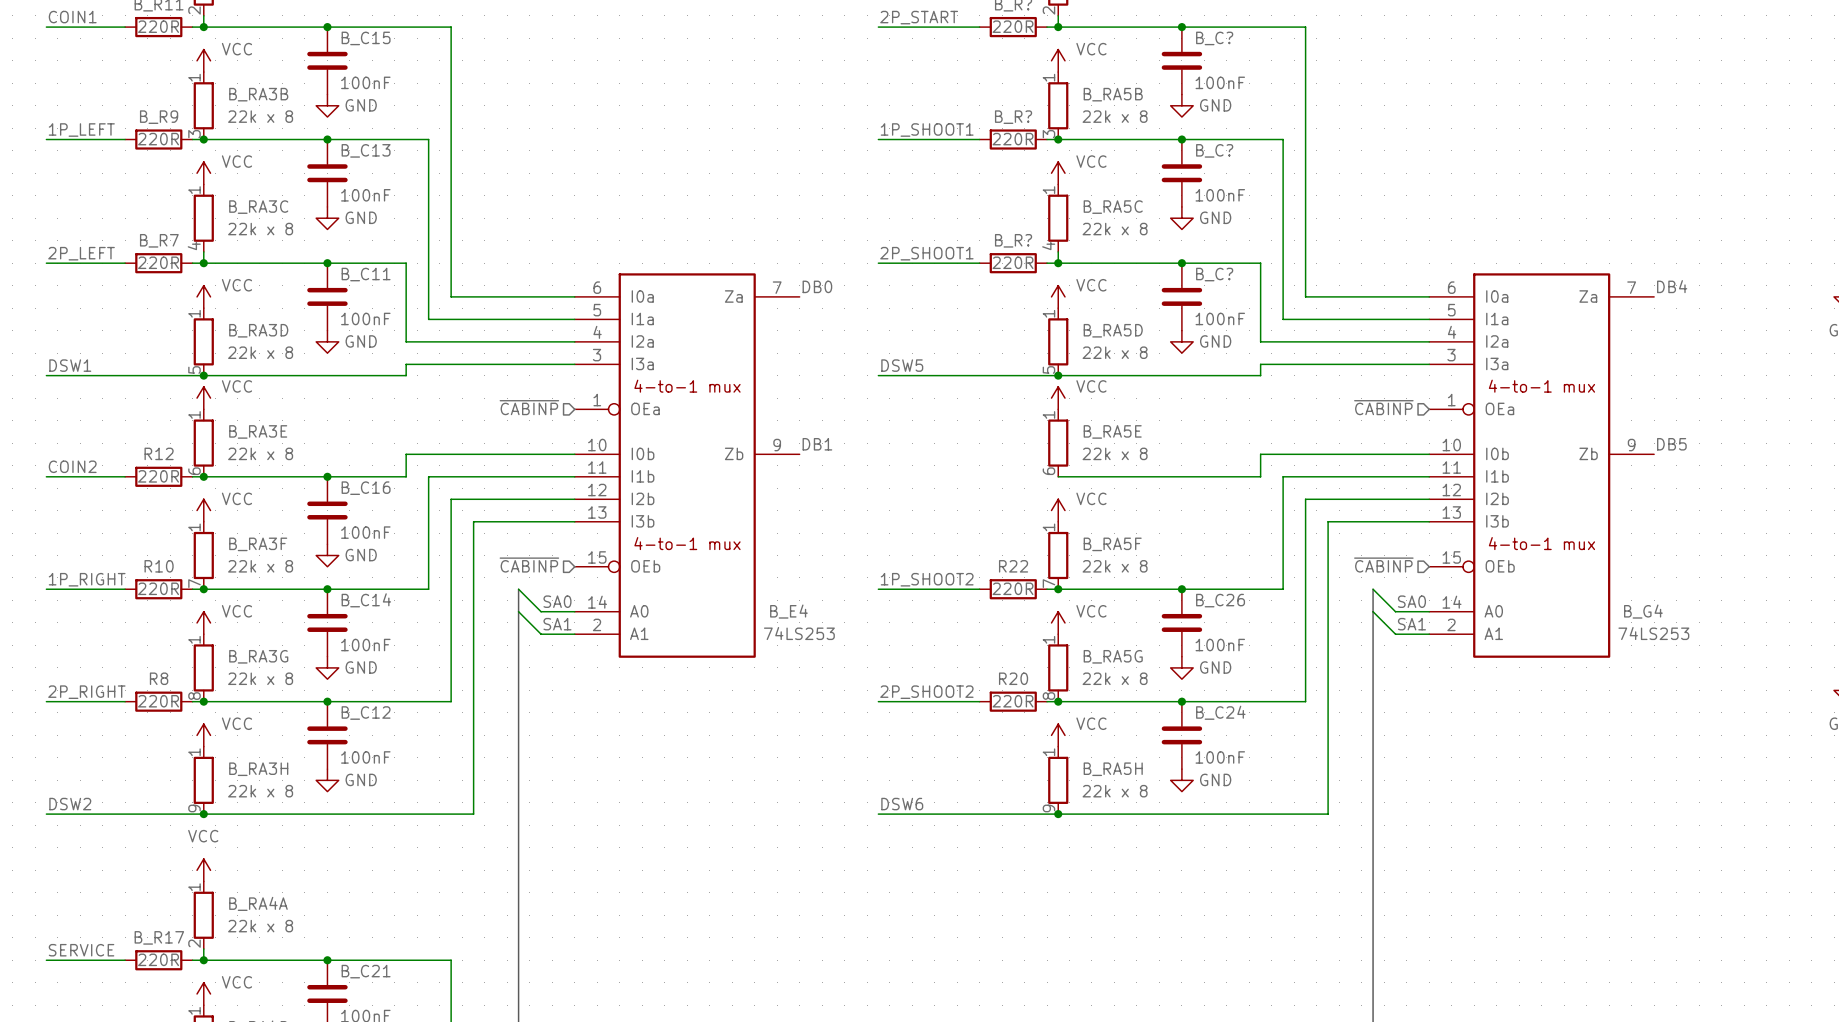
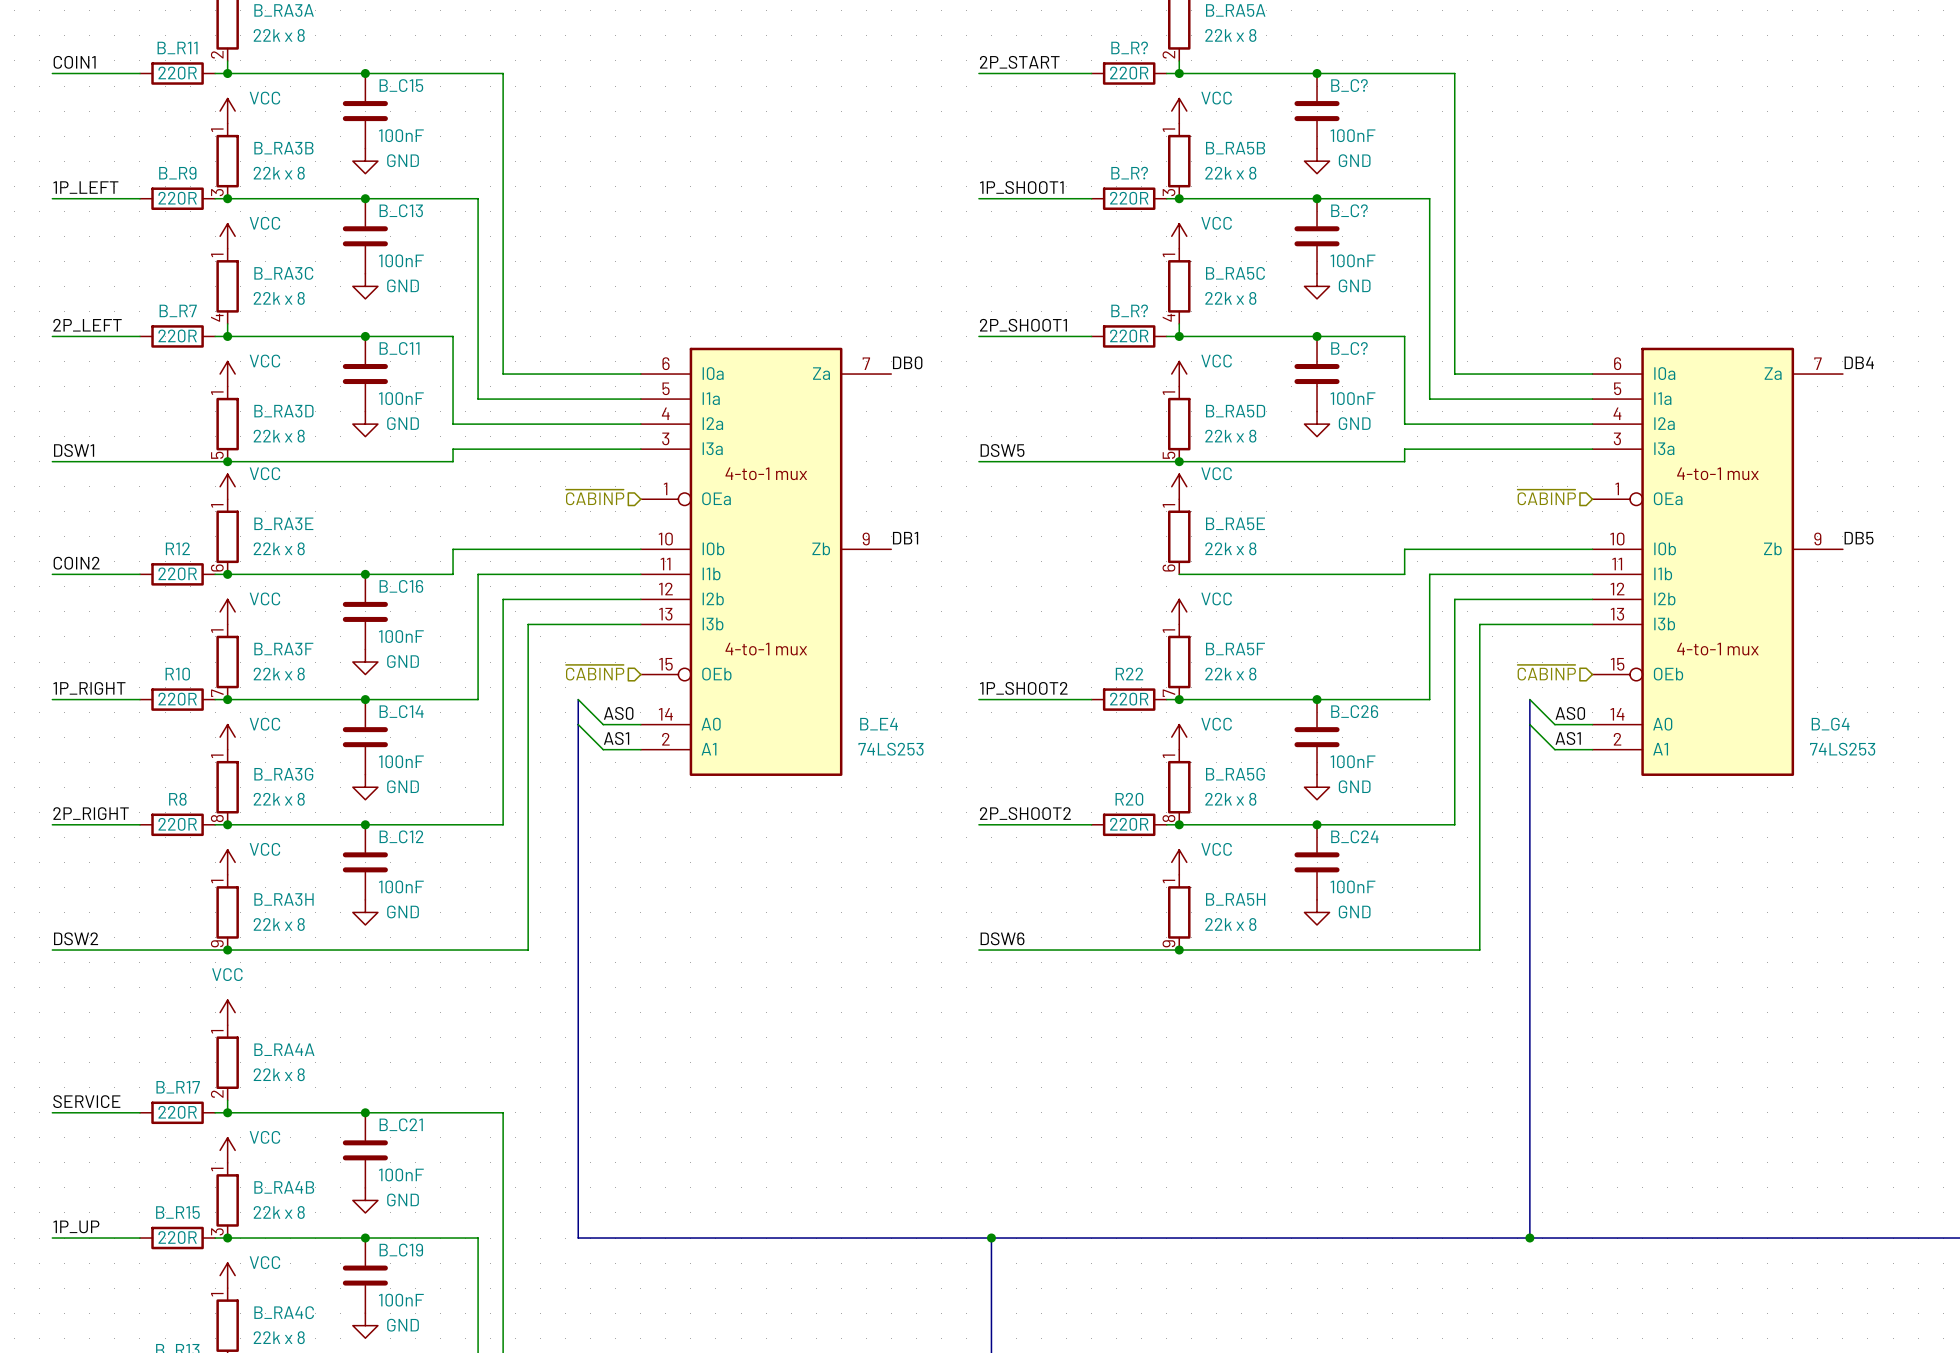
label: SA0 (557, 601) -> AS0 (618, 713)
label: SA0 (1411, 601) -> AS0 (1570, 713)
label: SA1 (557, 624) -> AS1 (616, 738)
label: SA1 (1411, 624) -> AS1 (1568, 738)

